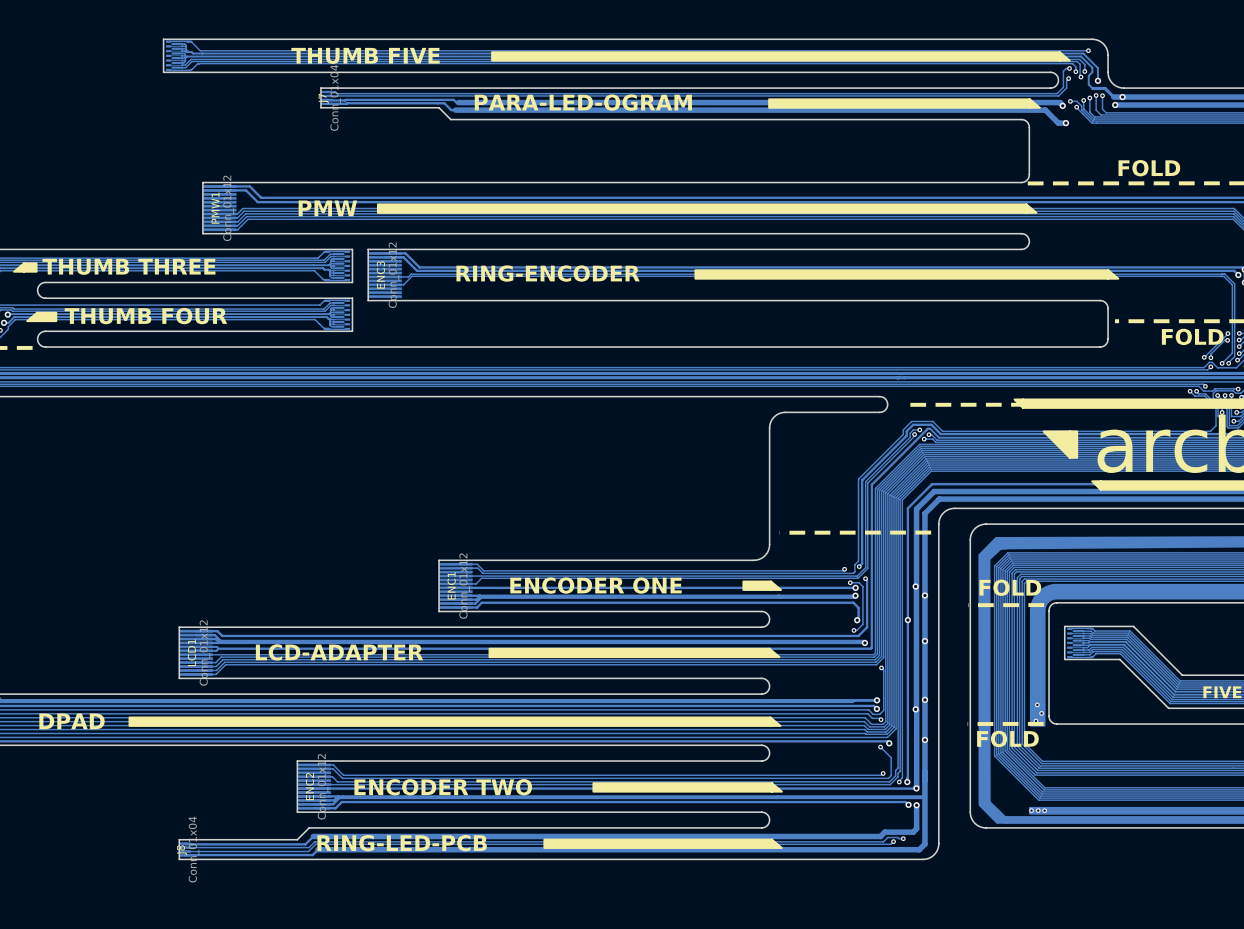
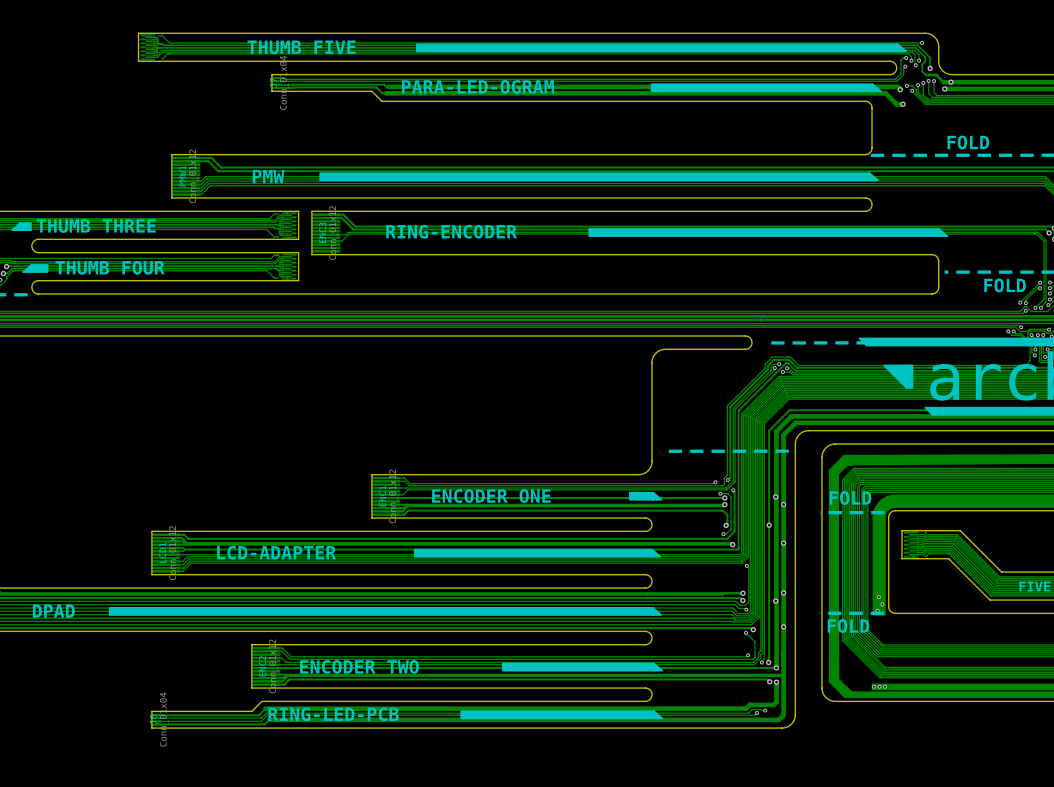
part footprint: [165, 40, 193, 72] -> [140, 34, 156, 61]
part footprint: [323, 250, 351, 282] -> [281, 212, 297, 239]
part footprint: [323, 299, 351, 331] -> [281, 253, 297, 280]
part footprint: [1067, 627, 1094, 659] -> [904, 531, 919, 558]

